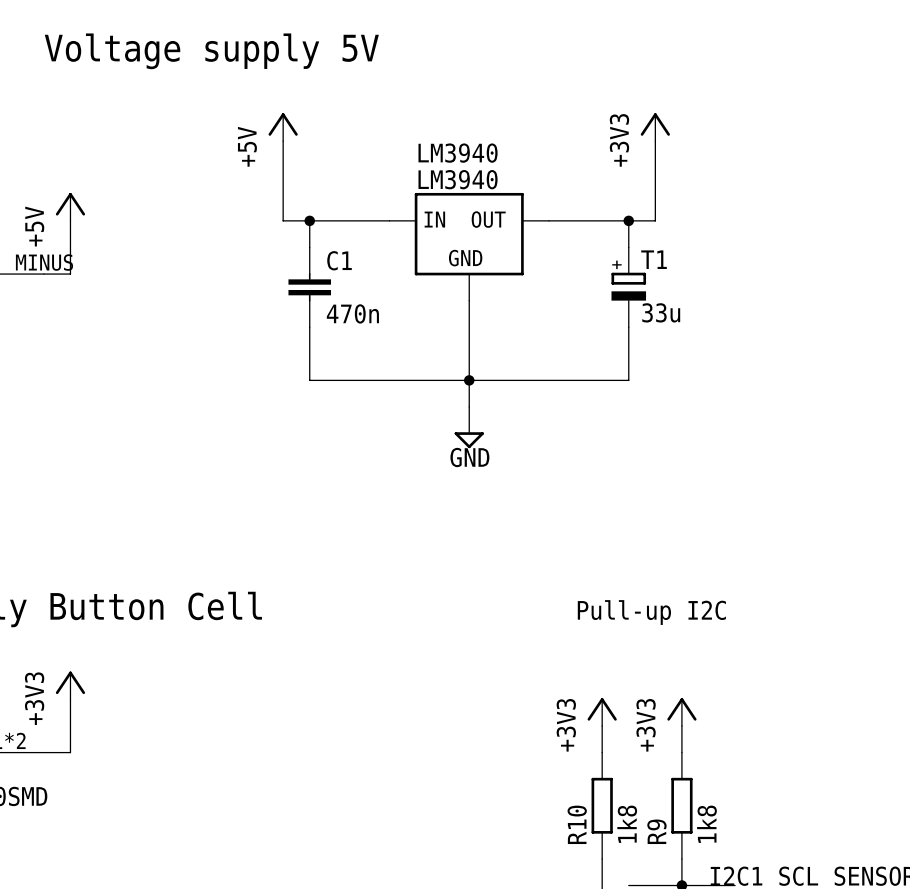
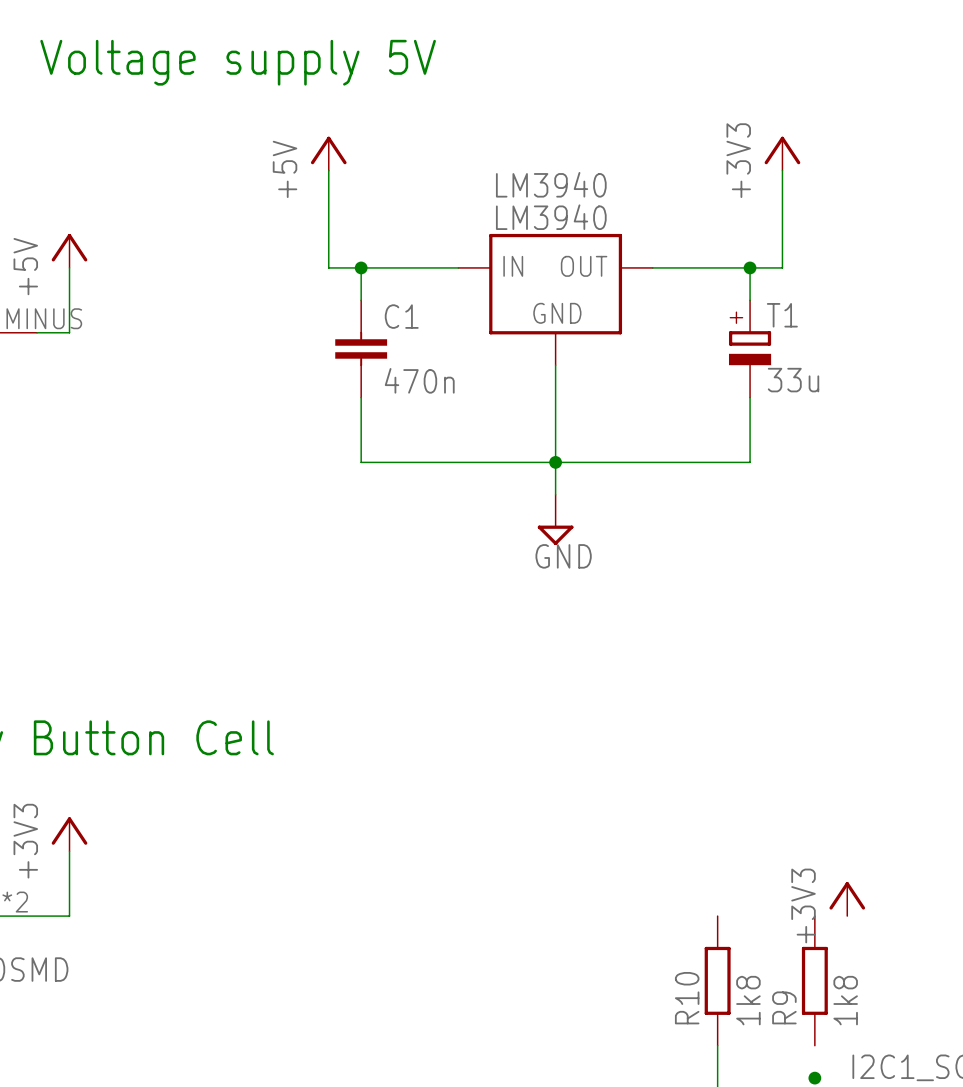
text: Pull-up I2C (651, 612) -> none
power symbol: +3V3 (602, 712) -> none
power symbol position: +3V3 (681, 712) -> +3V3 (847, 899)
wire: (602, 726) (602, 752) -> none
wire: (681, 726) (681, 752) -> none
wire: (681, 858) (681, 885) -> none
wire: (628, 885) (735, 885) -> none

